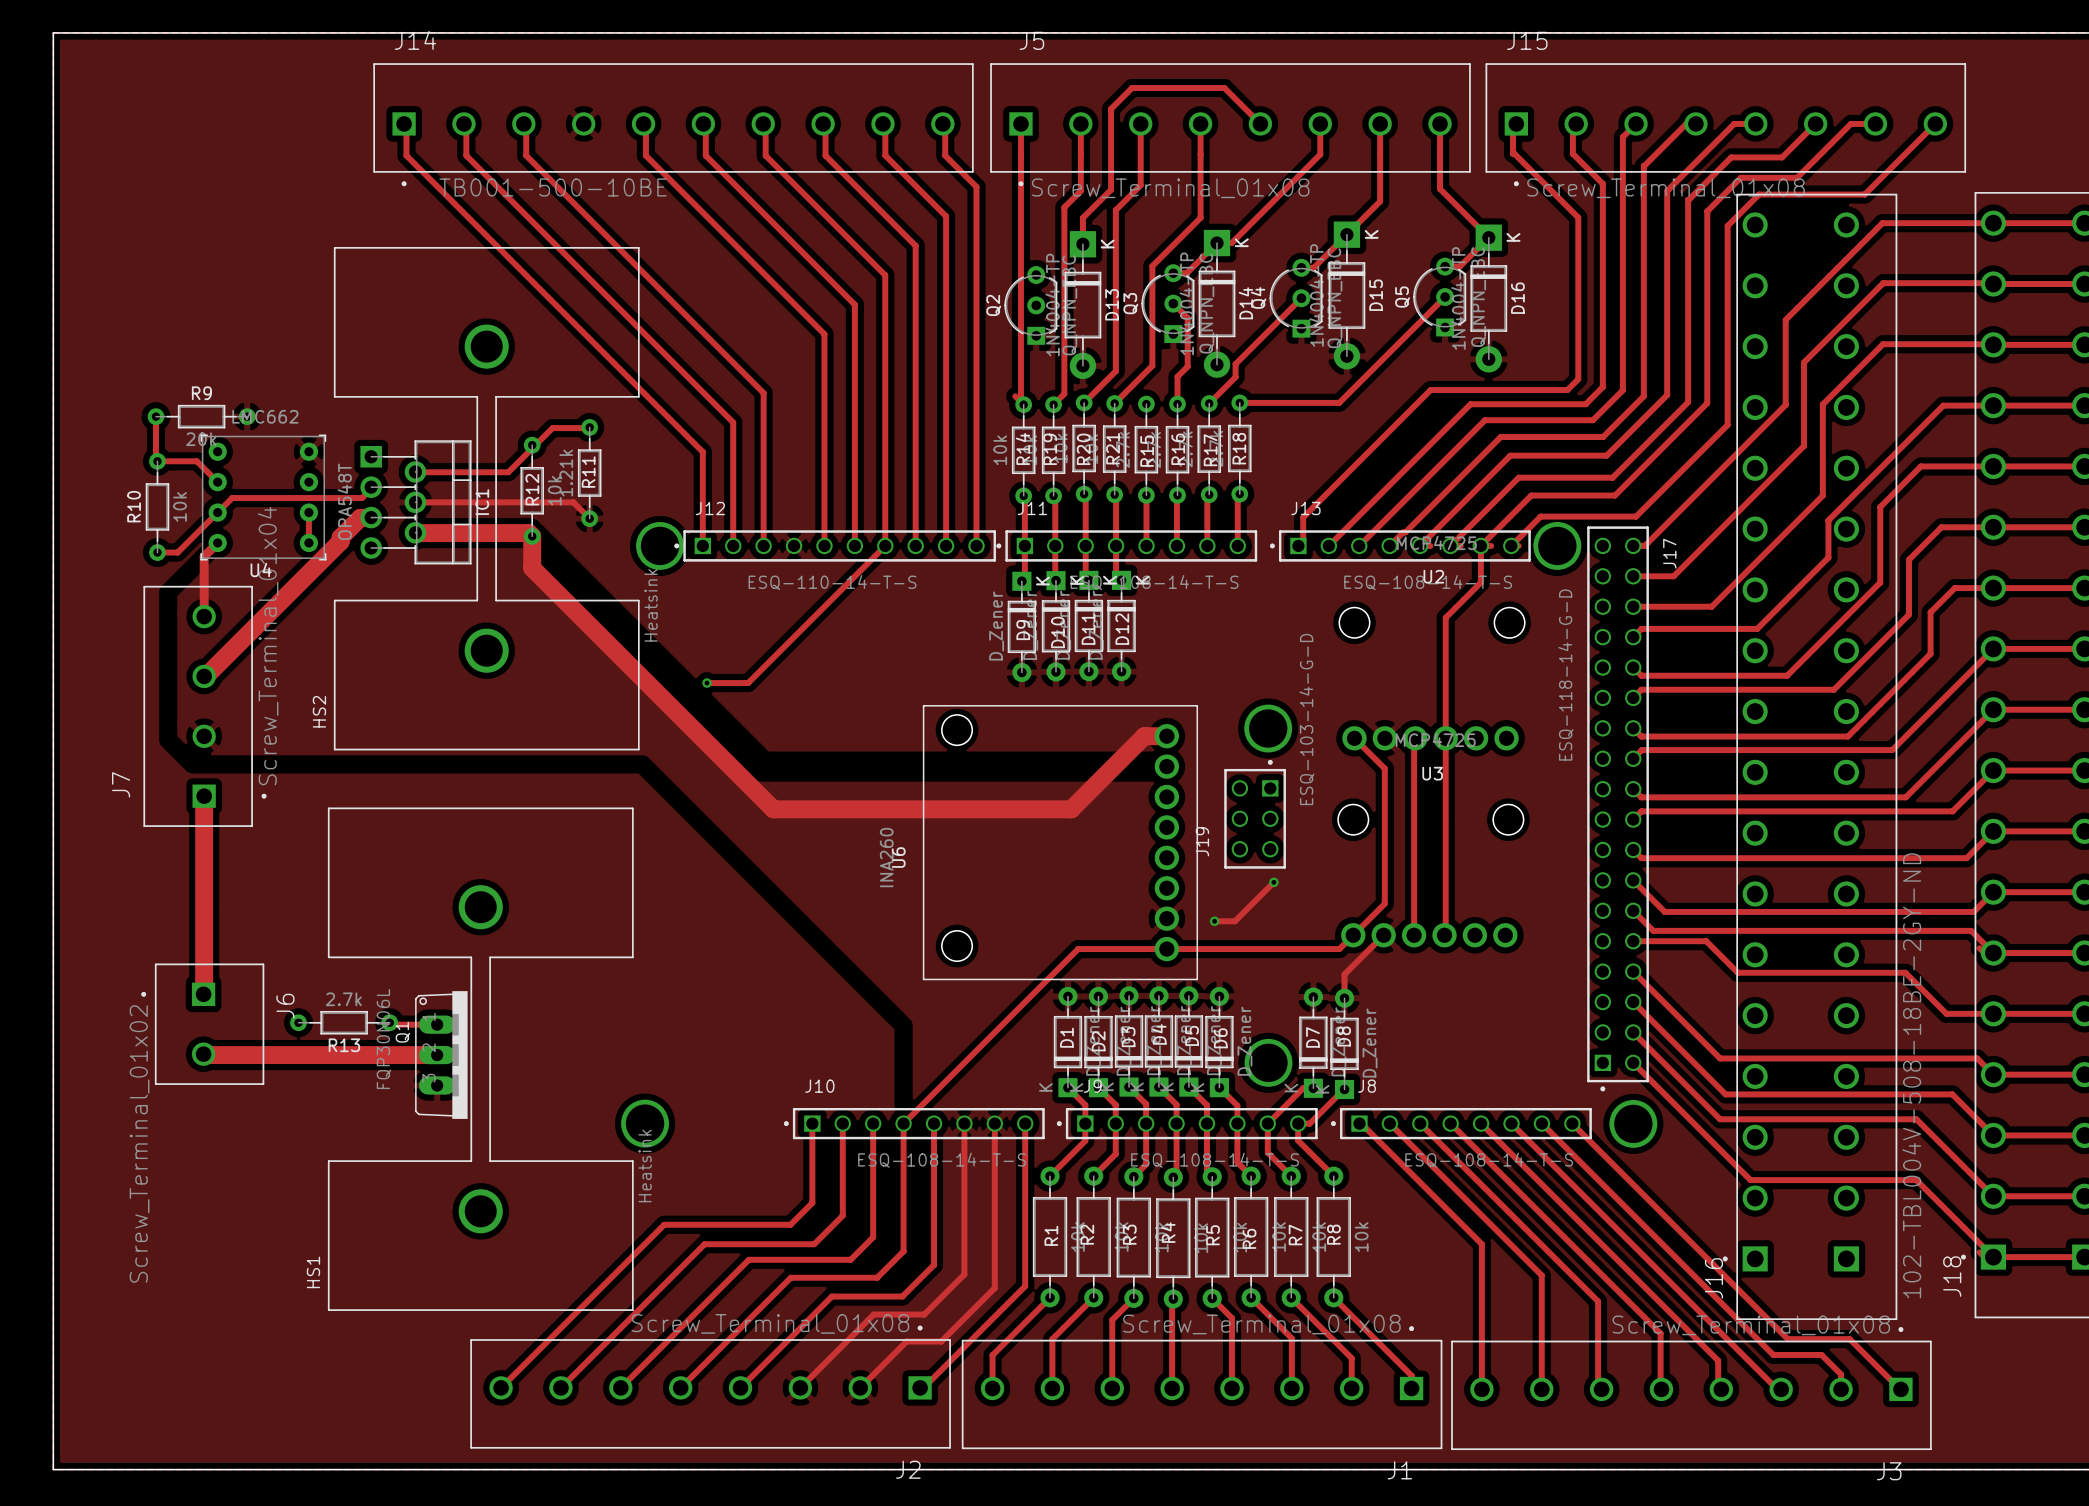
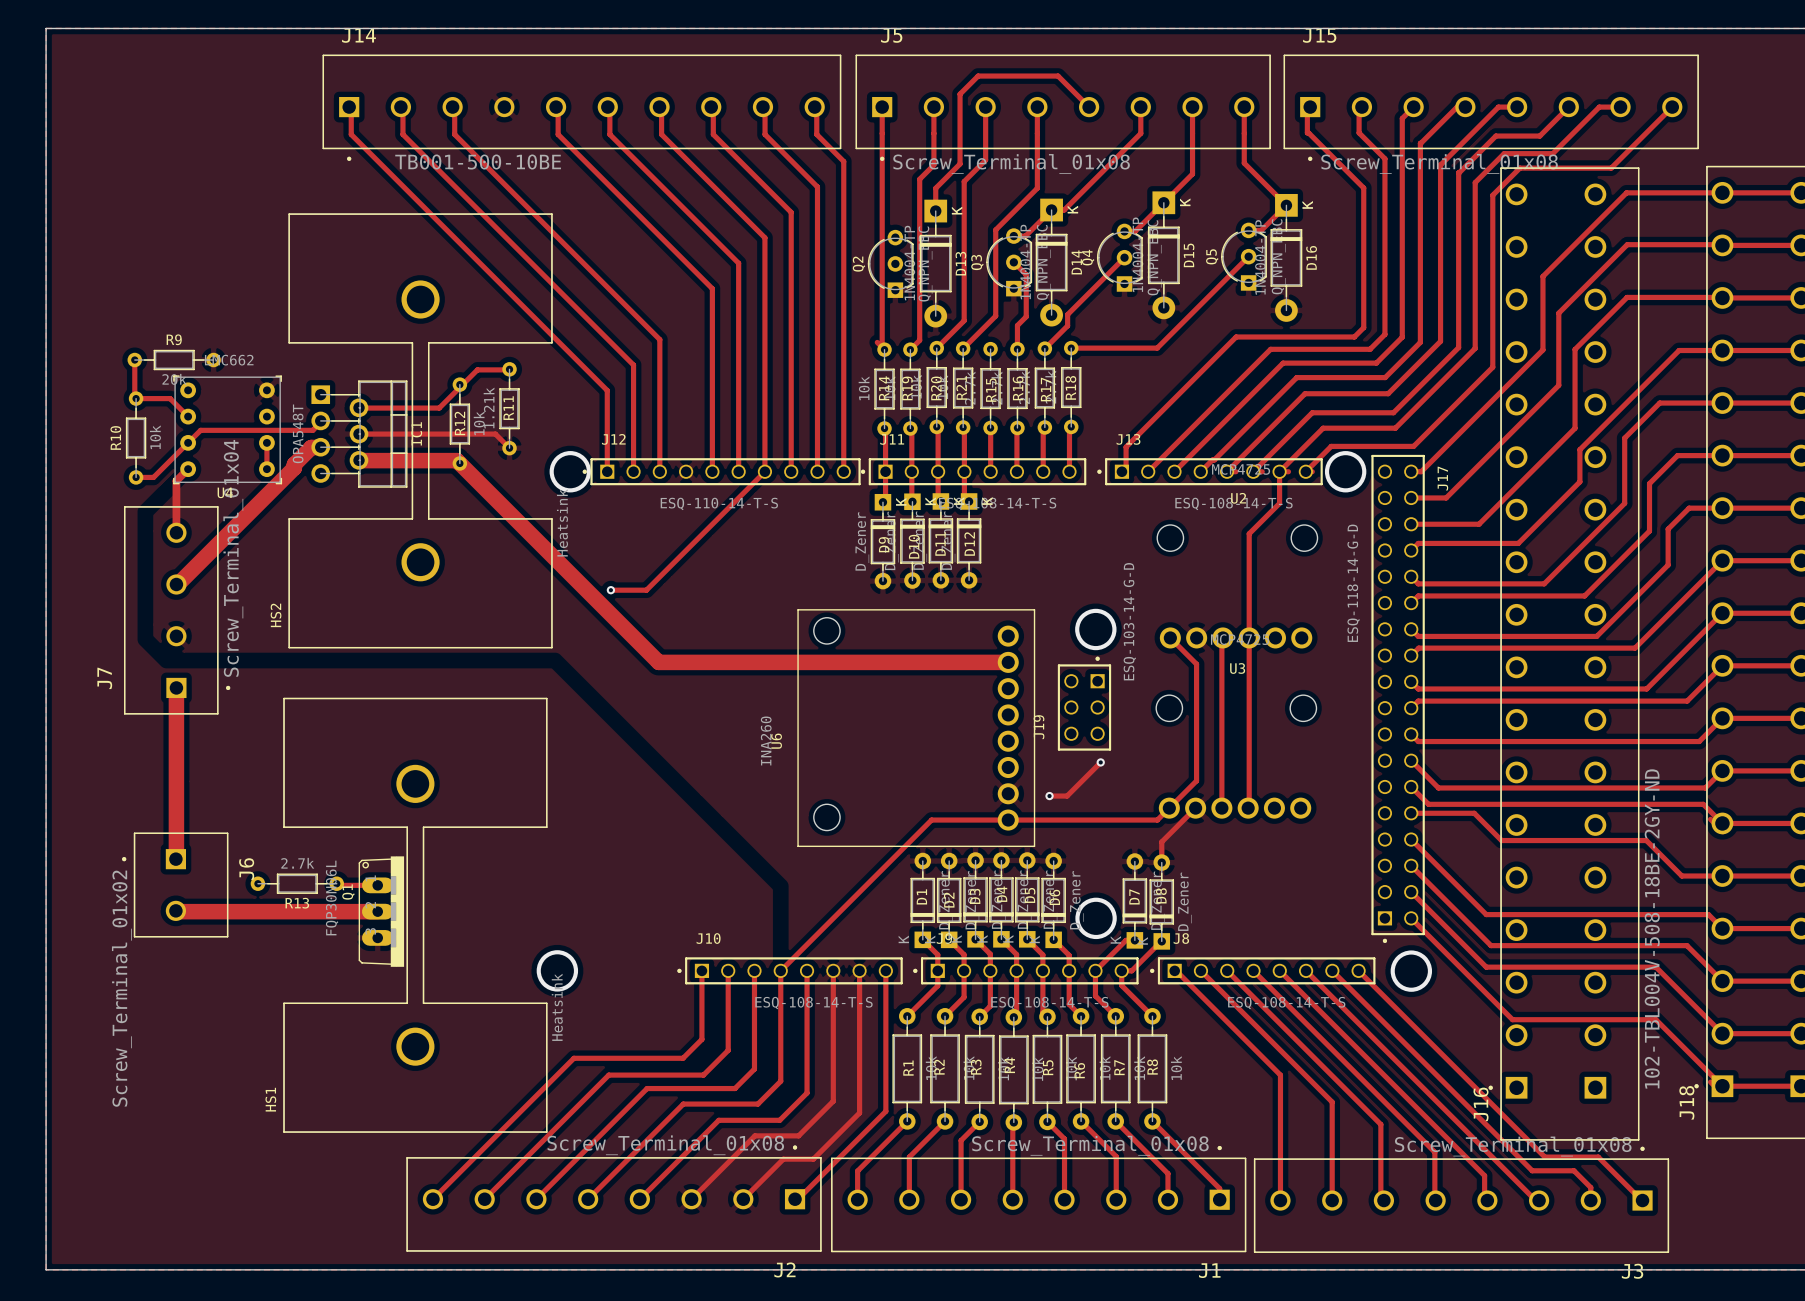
track: (532, 536) (532, 568) (773, 809) (1071, 809) (1144, 736) (1166, 736) -> (459, 463) (658, 662) (1008, 662)

